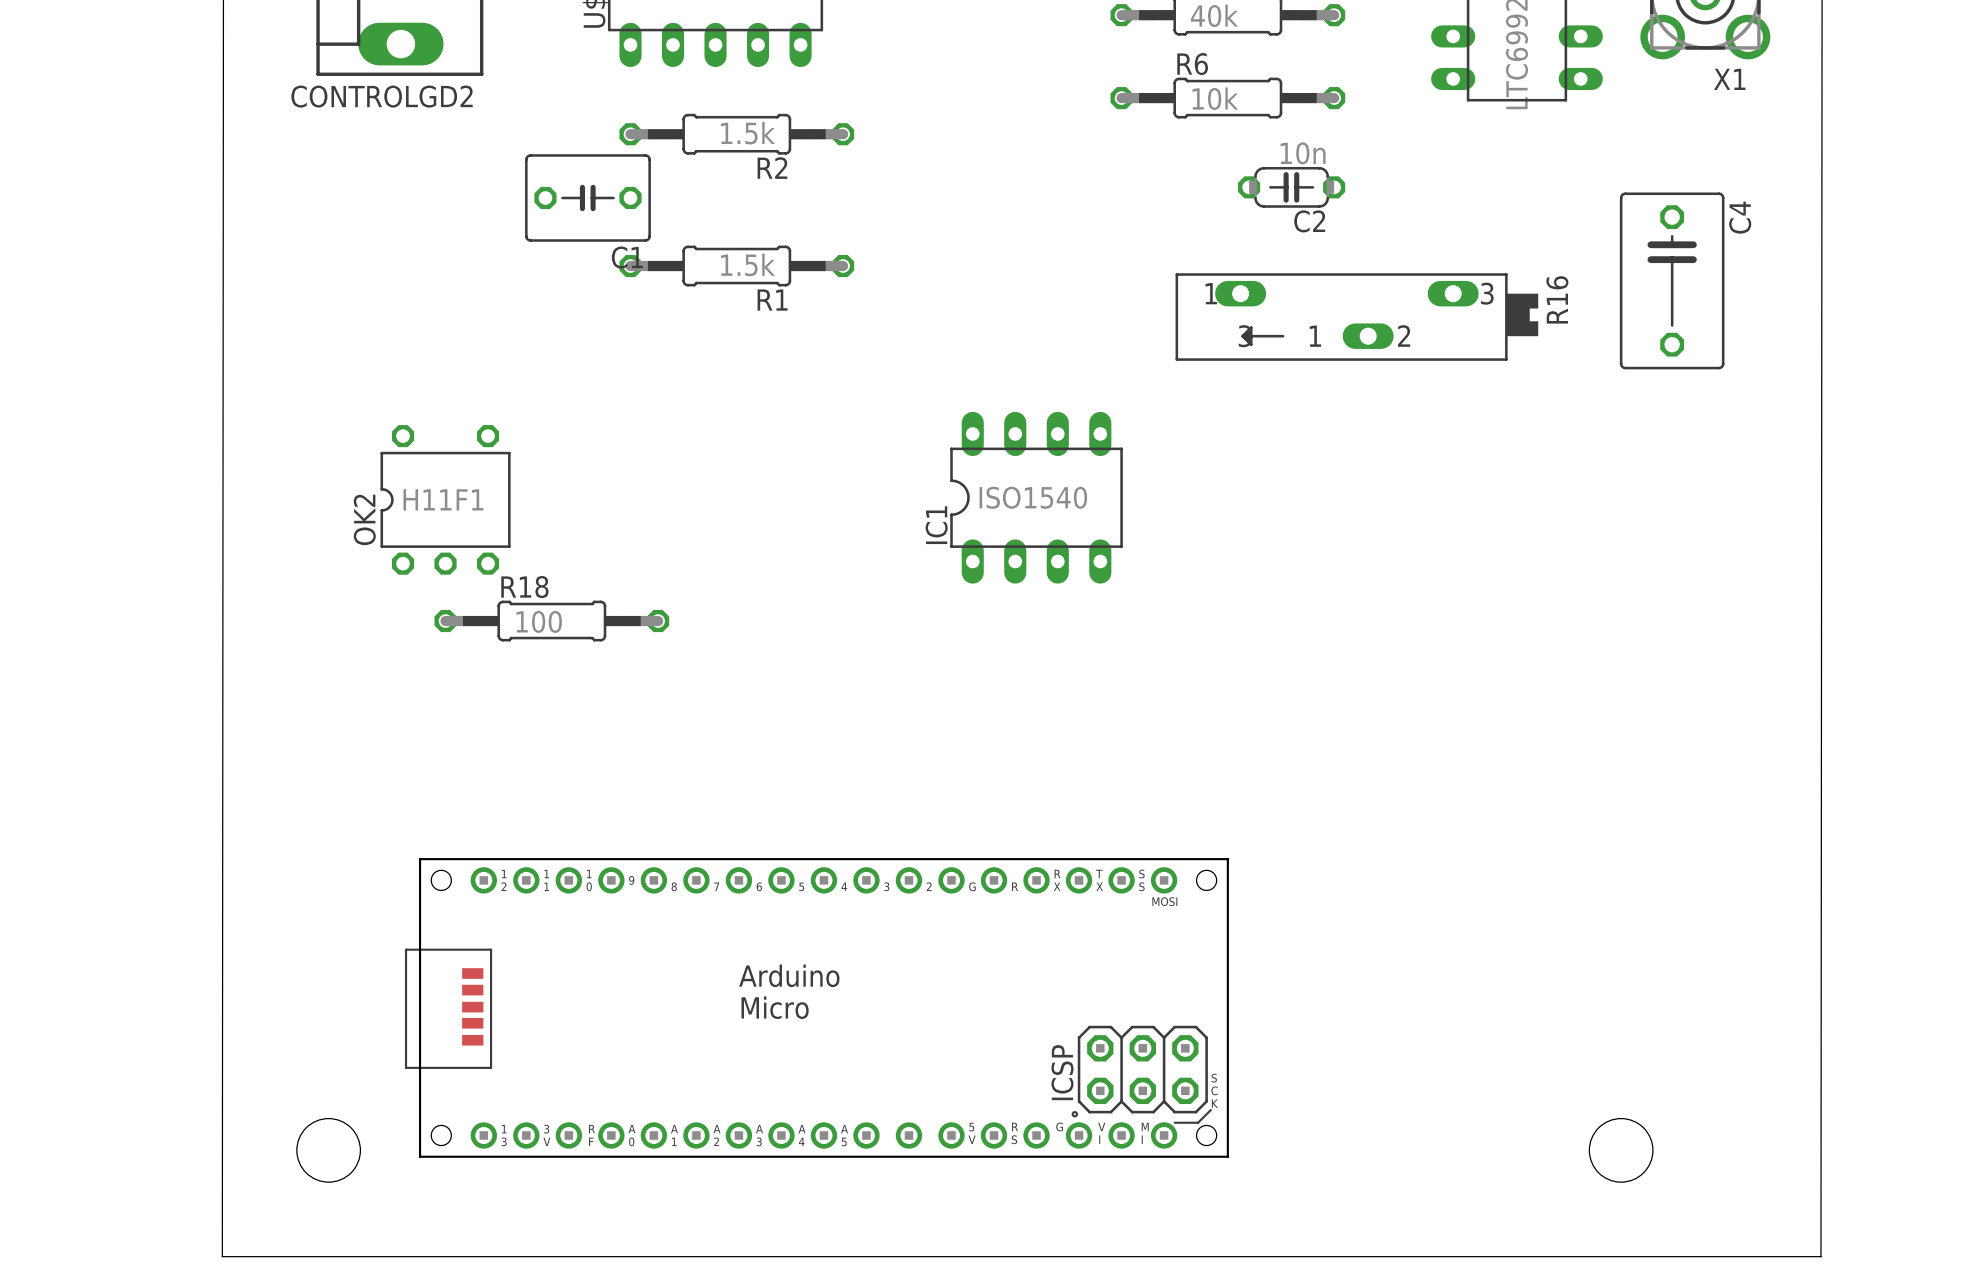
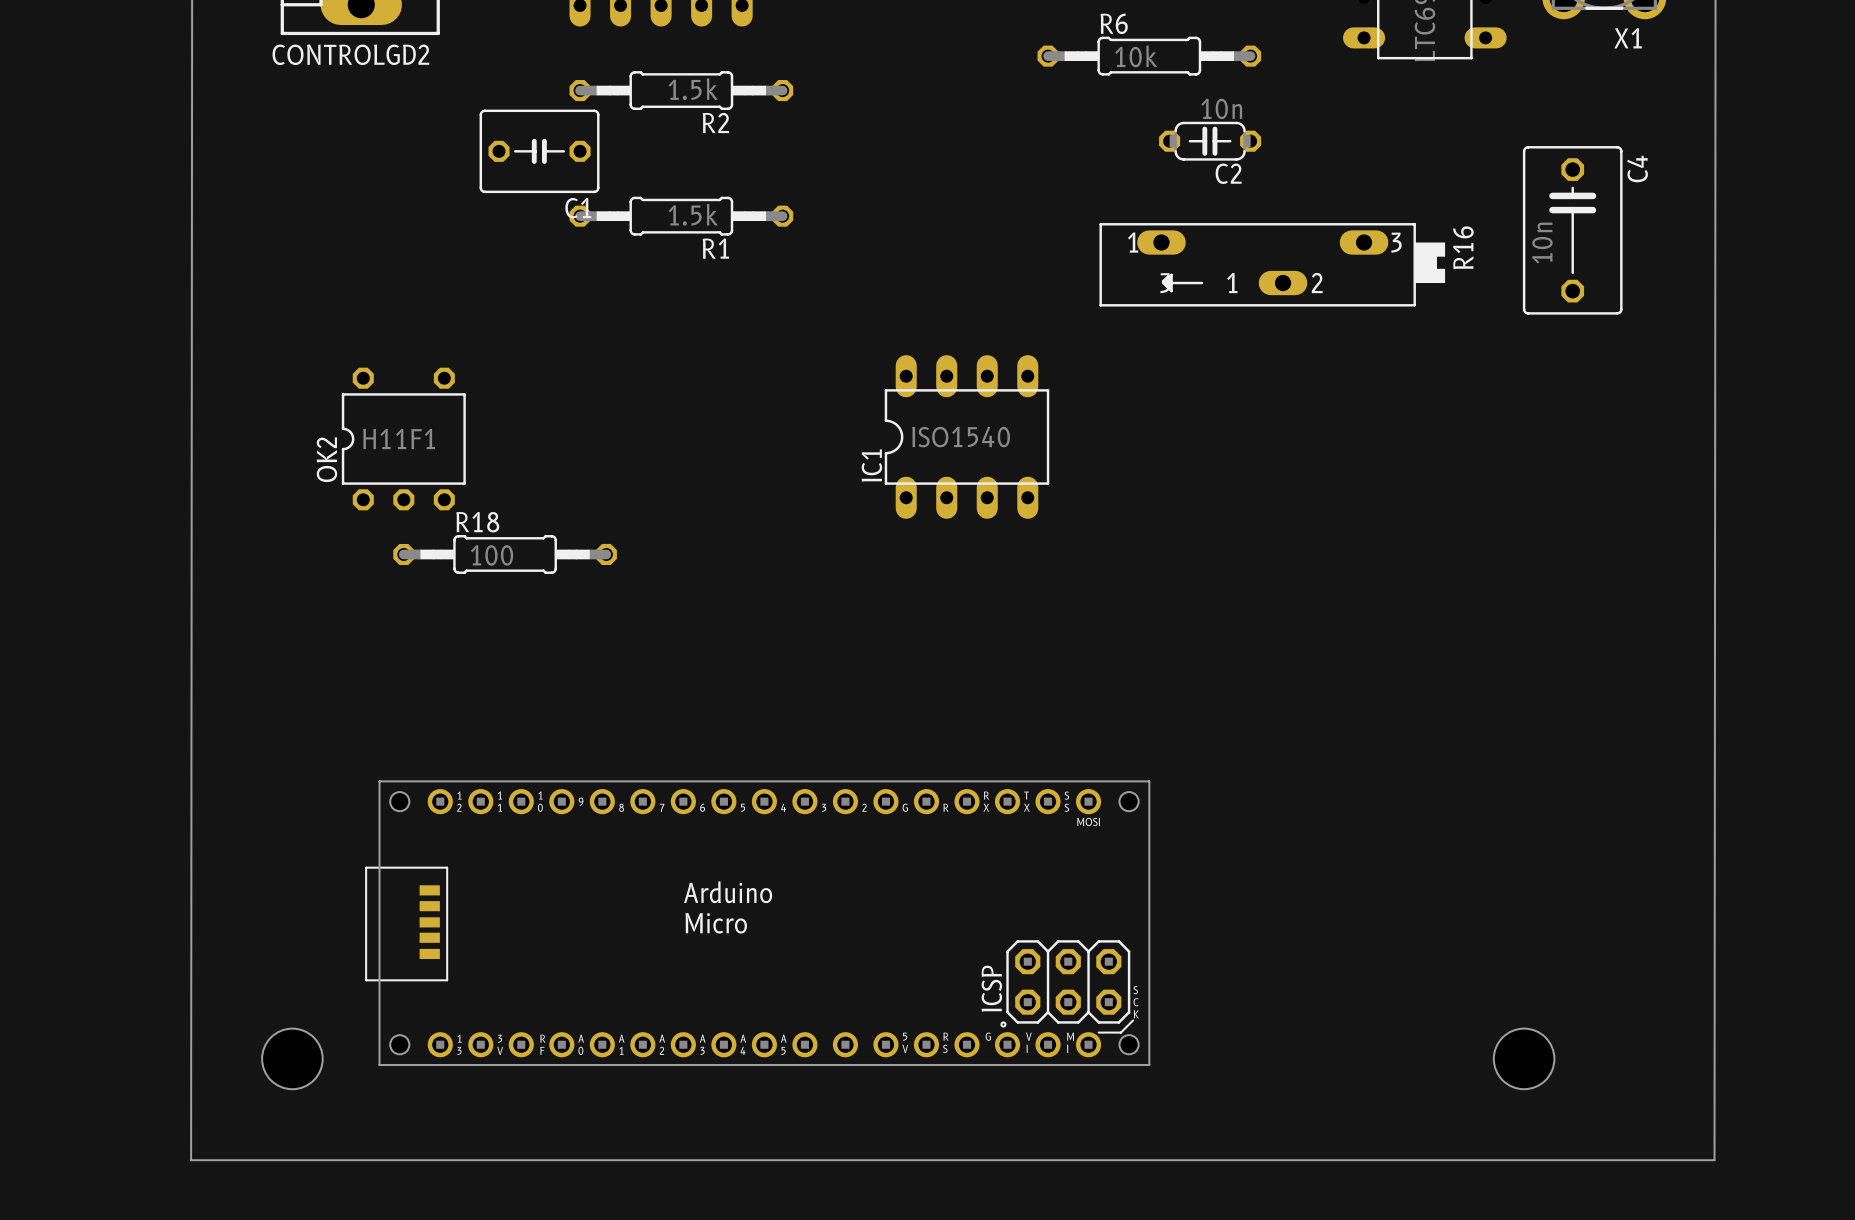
C4 value: none -> 10n (1542, 243)

